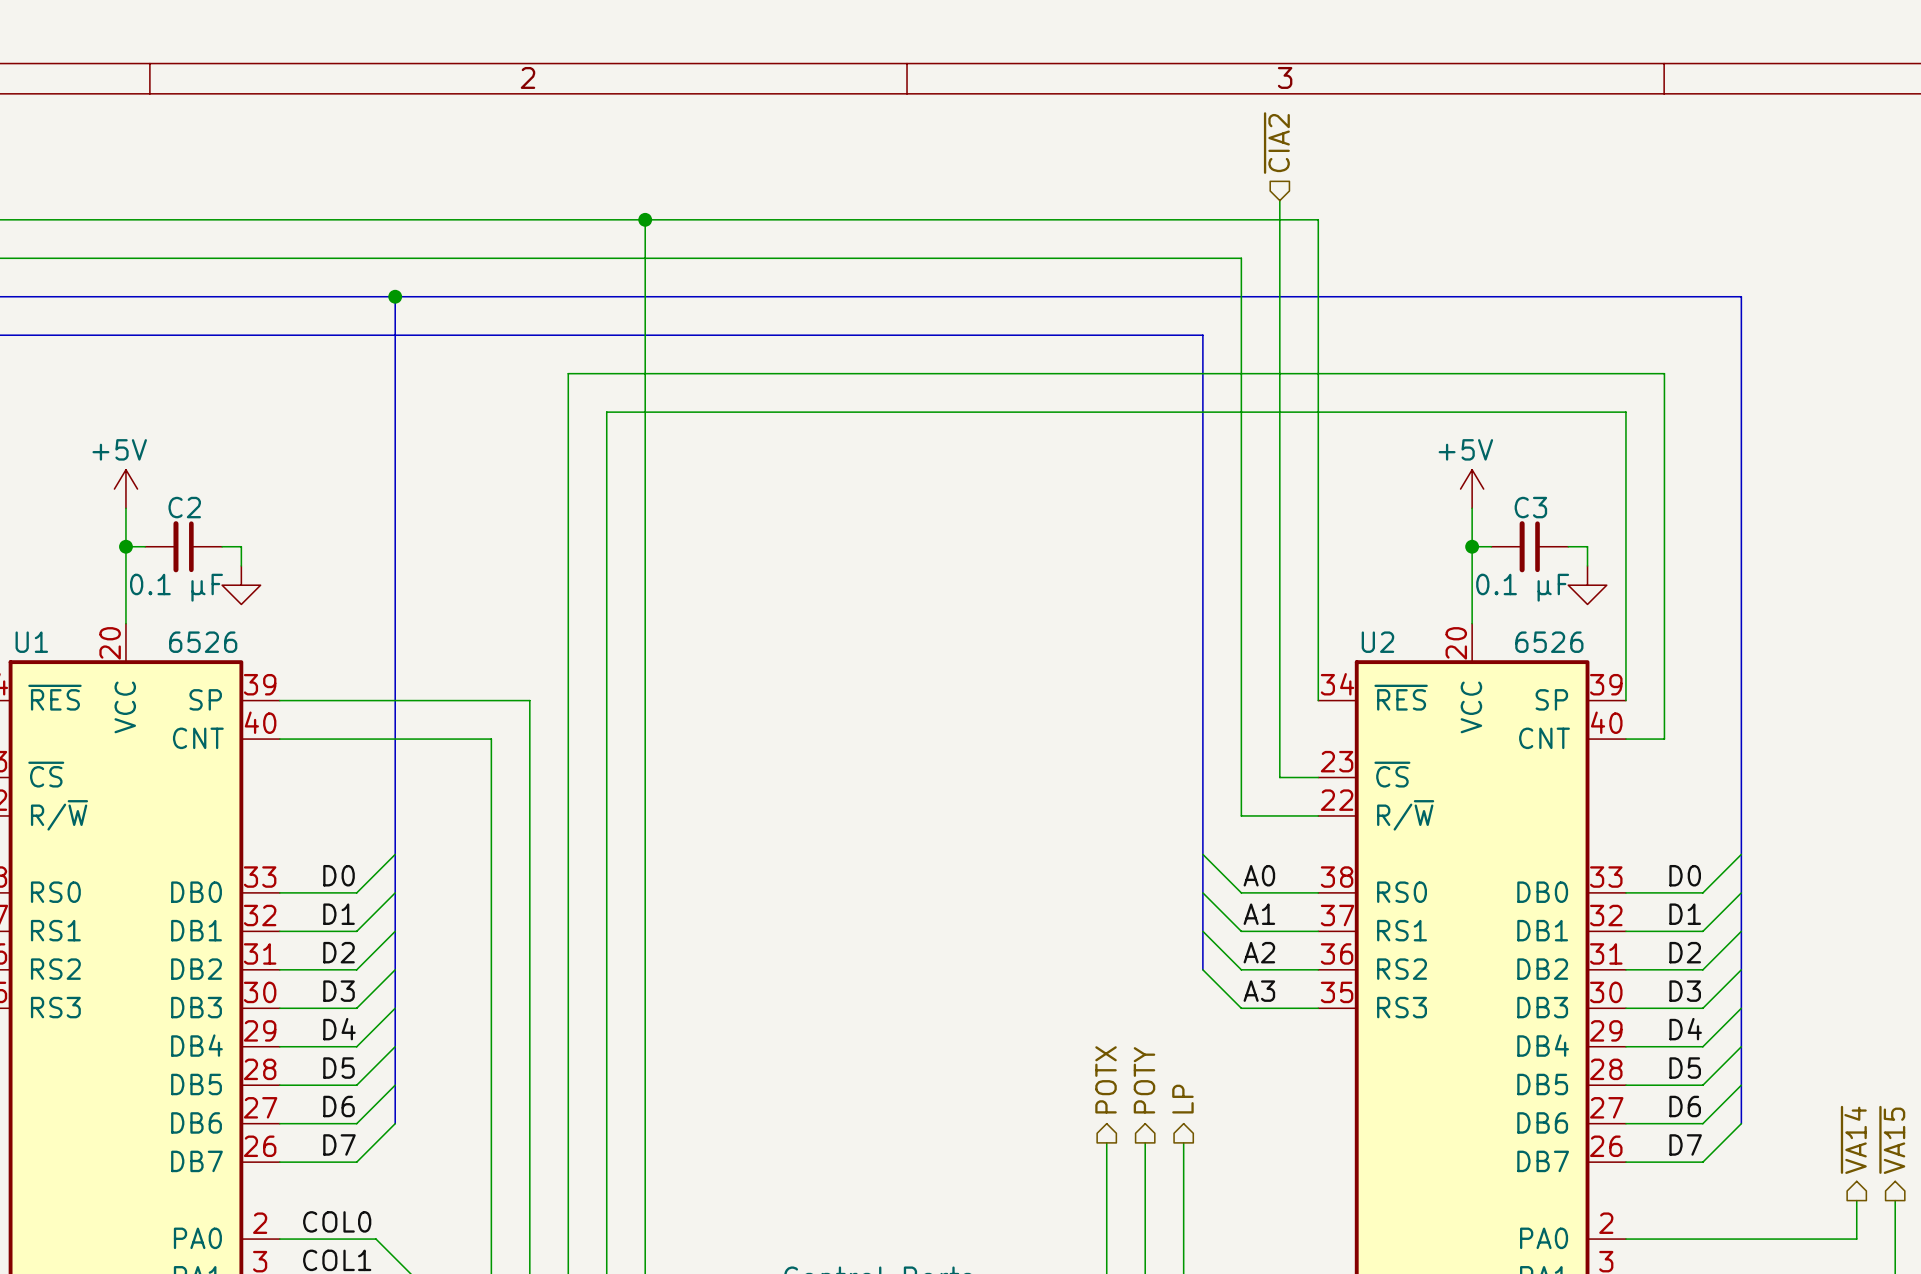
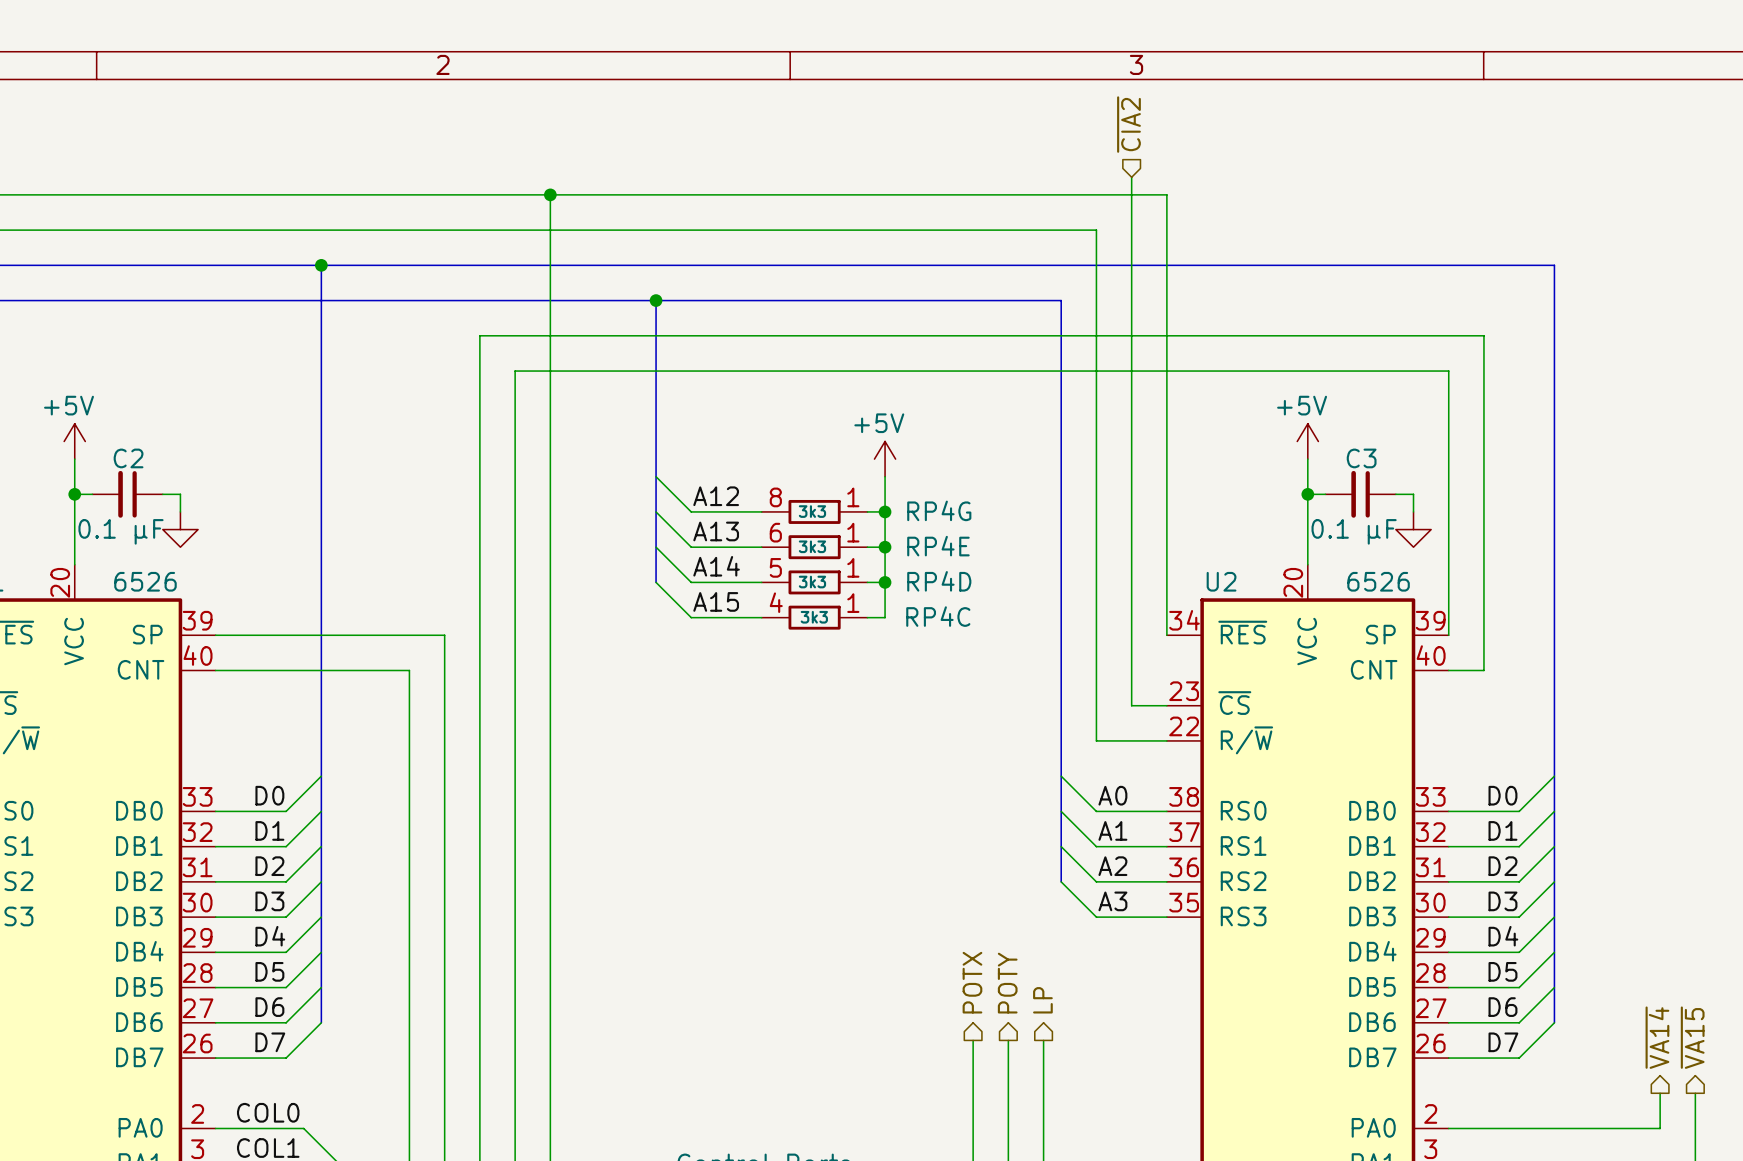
bus: none -> (656, 300) (656, 582)
junction: none -> (656, 300)
power symbol: none -> +5V (885, 459)
wire: none -> (656, 476) (691, 511) (761, 511)
wire: none -> (885, 476) (885, 617) (867, 617)
label: none -> A12 (716, 496)
wire: none -> (656, 511) (691, 547) (761, 547)
RP4G: none -> 3k3 (814, 511)
wire: none -> (867, 511) (885, 511)
junction: none -> (885, 511)
label: none -> A13 (716, 531)
wire: none -> (656, 547) (691, 582) (761, 582)
RP4E: none -> 3k3 (814, 547)
wire: none -> (867, 547) (885, 547)
junction: none -> (885, 547)
label: none -> A14 (716, 566)
wire: none -> (656, 582) (691, 617) (761, 617)
RP4D: none -> 3k3 (814, 582)
wire: none -> (867, 582) (885, 582)
junction: none -> (885, 582)
label: none -> A15 (716, 601)
RP4C: none -> 3k3 (814, 617)

